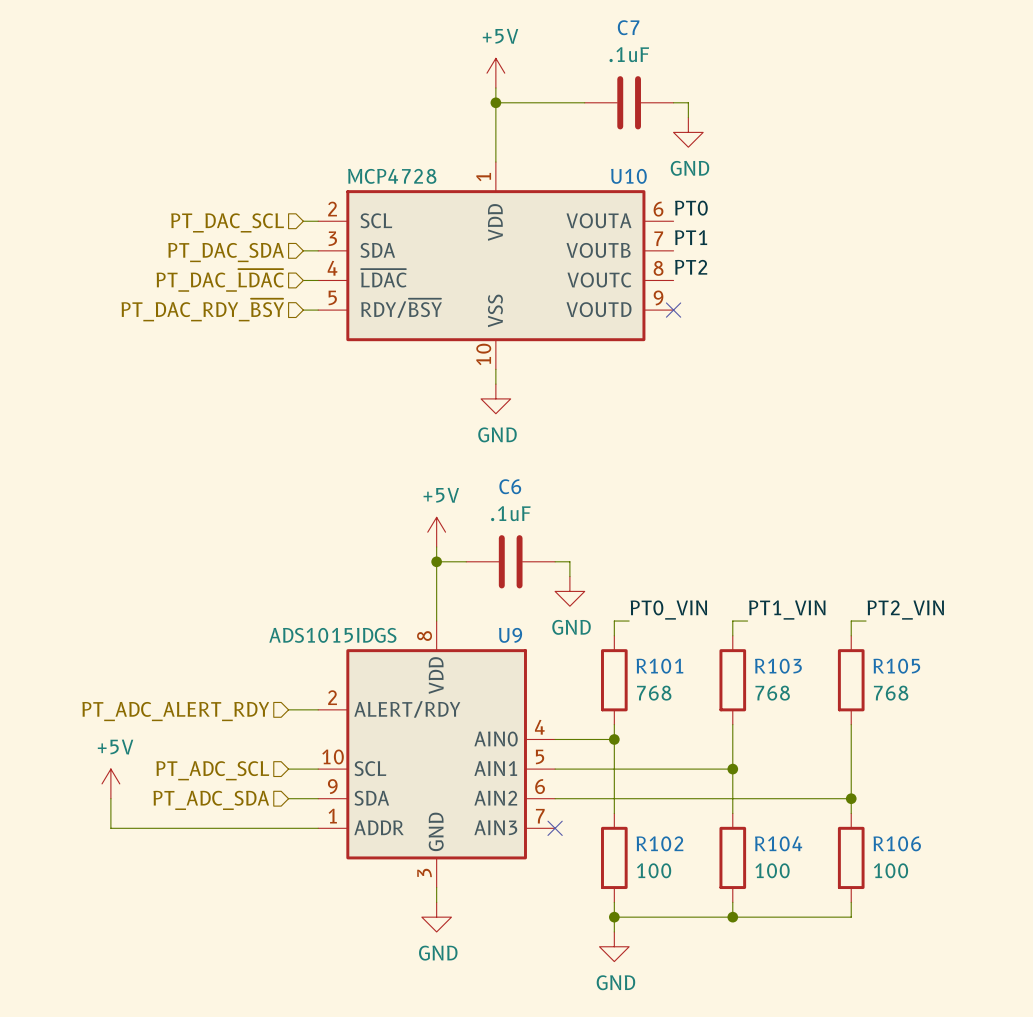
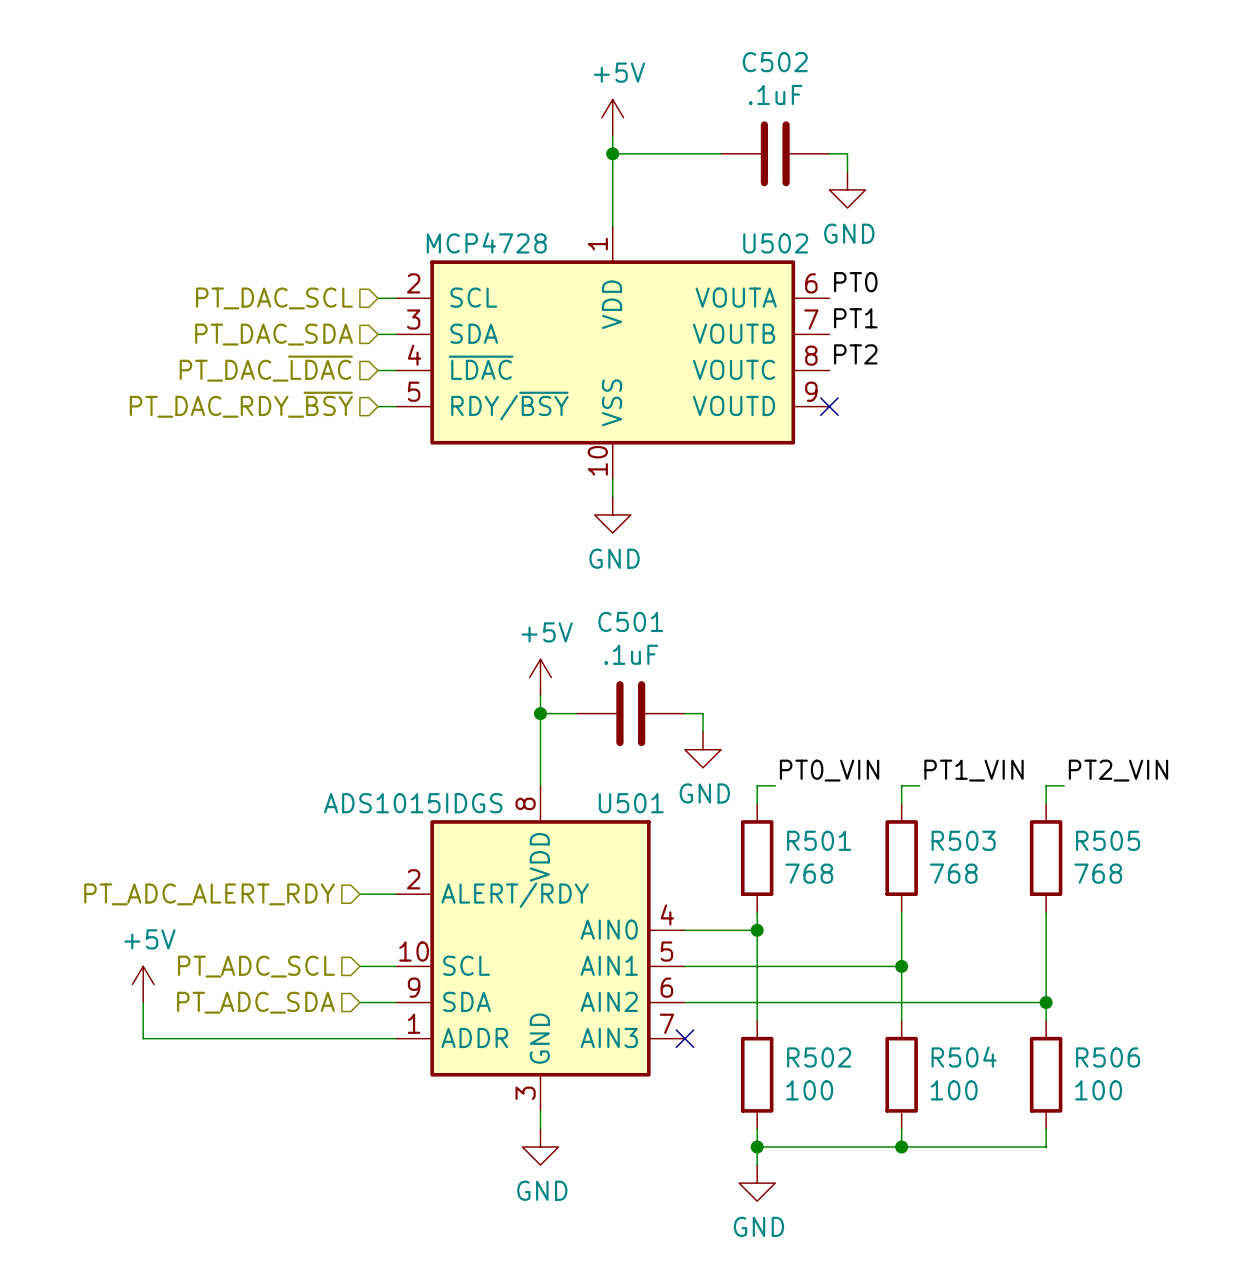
C7 name: C7 (628, 27) -> C502 (775, 62)
U10 name: U10 (628, 176) -> U502 (775, 243)
C6 name: C6 (510, 486) -> C501 (630, 621)
U9 name: U9 (510, 635) -> U501 (631, 803)
R101 name: R101 (659, 666) -> R501 (819, 840)
R103 name: R103 (778, 666) -> R503 (963, 840)
R105 name: R105 (896, 666) -> R505 (1108, 840)
R102 name: R102 (659, 843) -> R502 (819, 1057)
R104 name: R104 (778, 843) -> R504 (964, 1057)
R106 name: R106 (897, 843) -> R506 (1108, 1057)

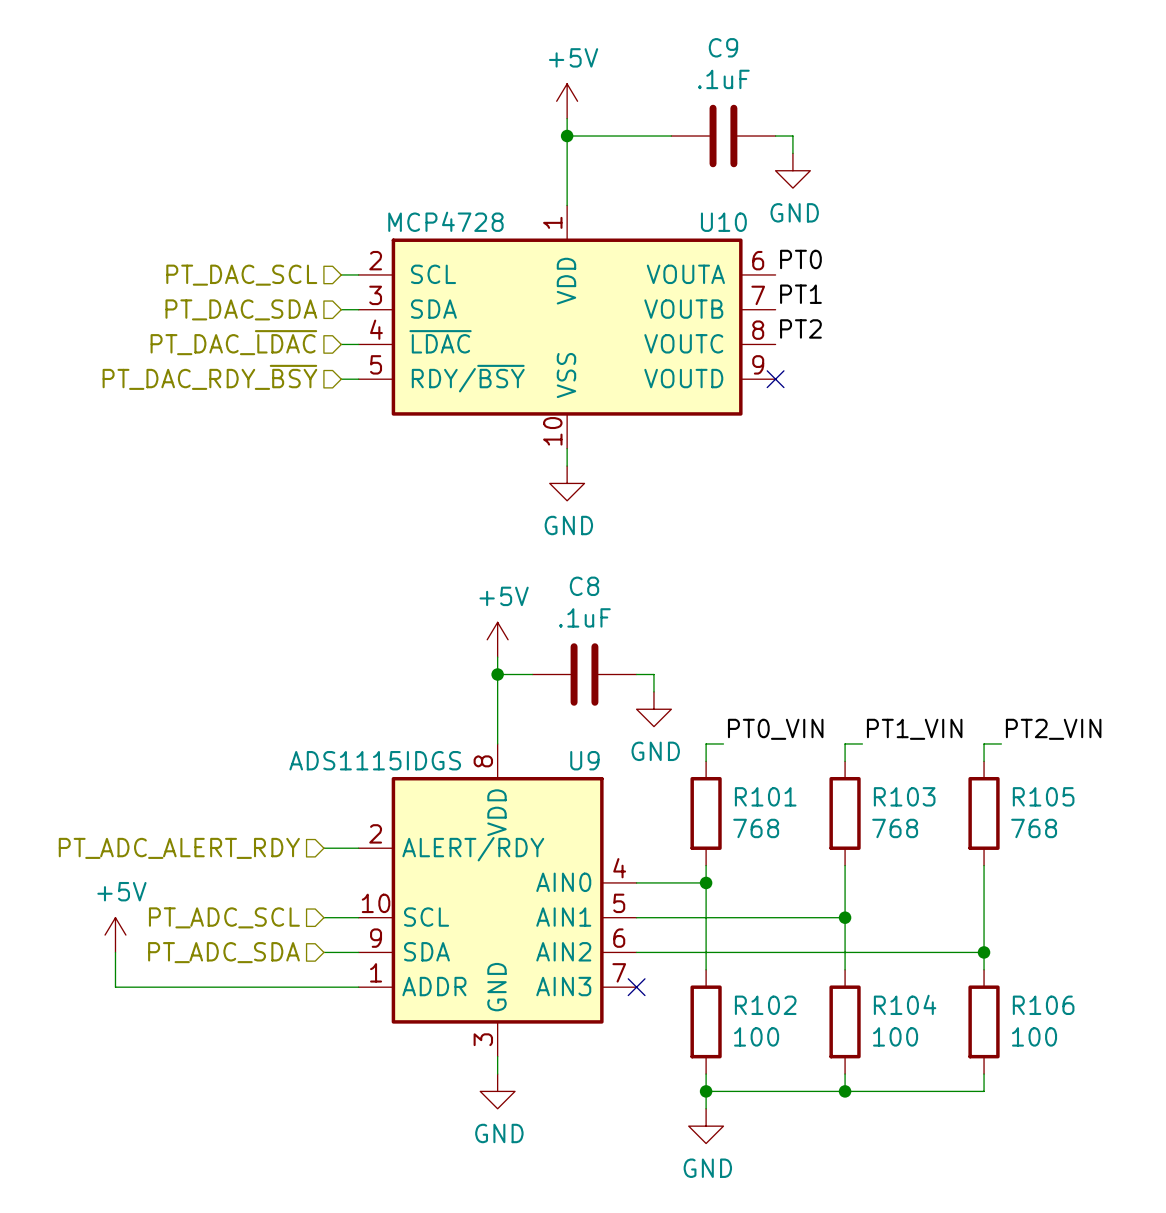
C502 name: C502 (775, 62) -> C9 (723, 47)
U502 name: U502 (775, 243) -> U10 (723, 222)
C501 name: C501 (630, 621) -> C8 (584, 586)
U501 value: ADS1015IDGS (413, 803) -> ADS1115IDGS (375, 760)
U501 name: U501 (631, 803) -> U9 (584, 760)
R501 name: R501 (819, 840) -> R101 (765, 796)
R503 name: R503 (963, 840) -> R103 (904, 796)
R505 name: R505 (1108, 840) -> R105 (1043, 796)
R502 name: R502 (819, 1057) -> R102 (765, 1005)
R504 name: R504 (964, 1057) -> R104 (905, 1004)
R506 name: R506 (1108, 1057) -> R106 (1043, 1005)

